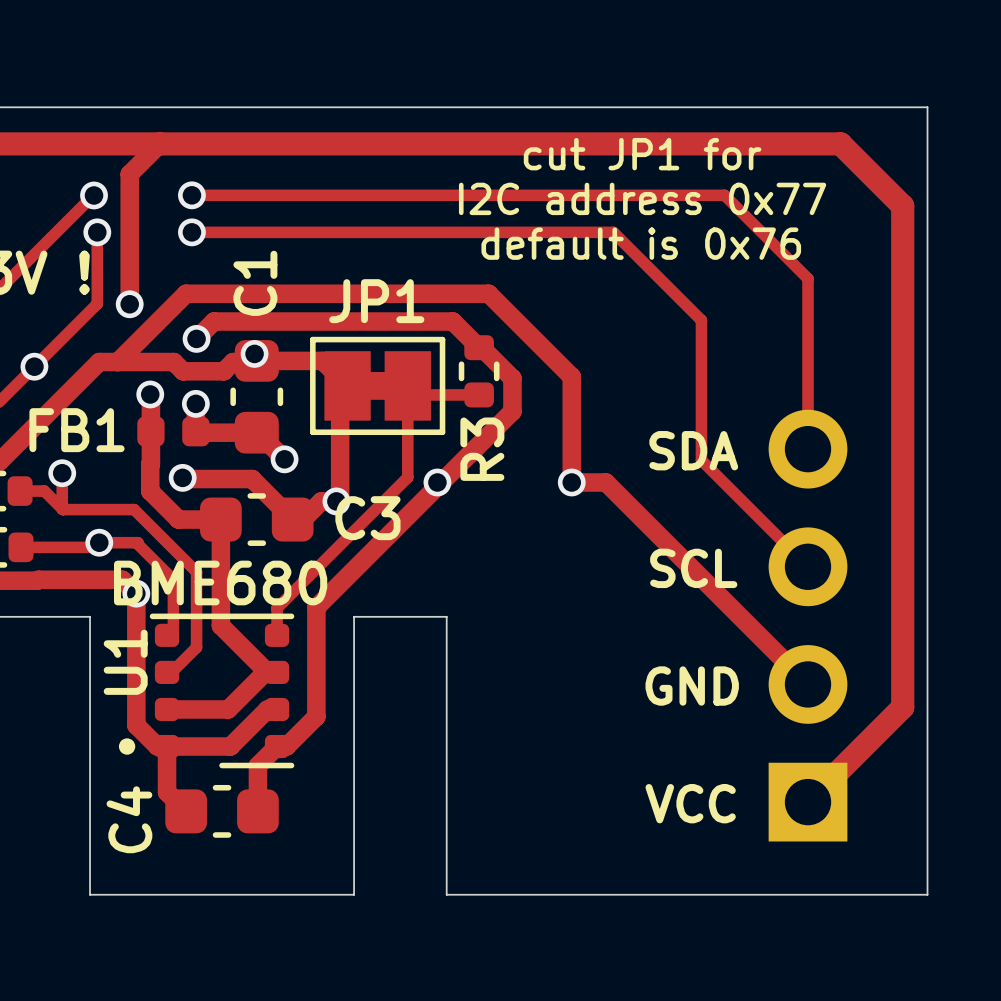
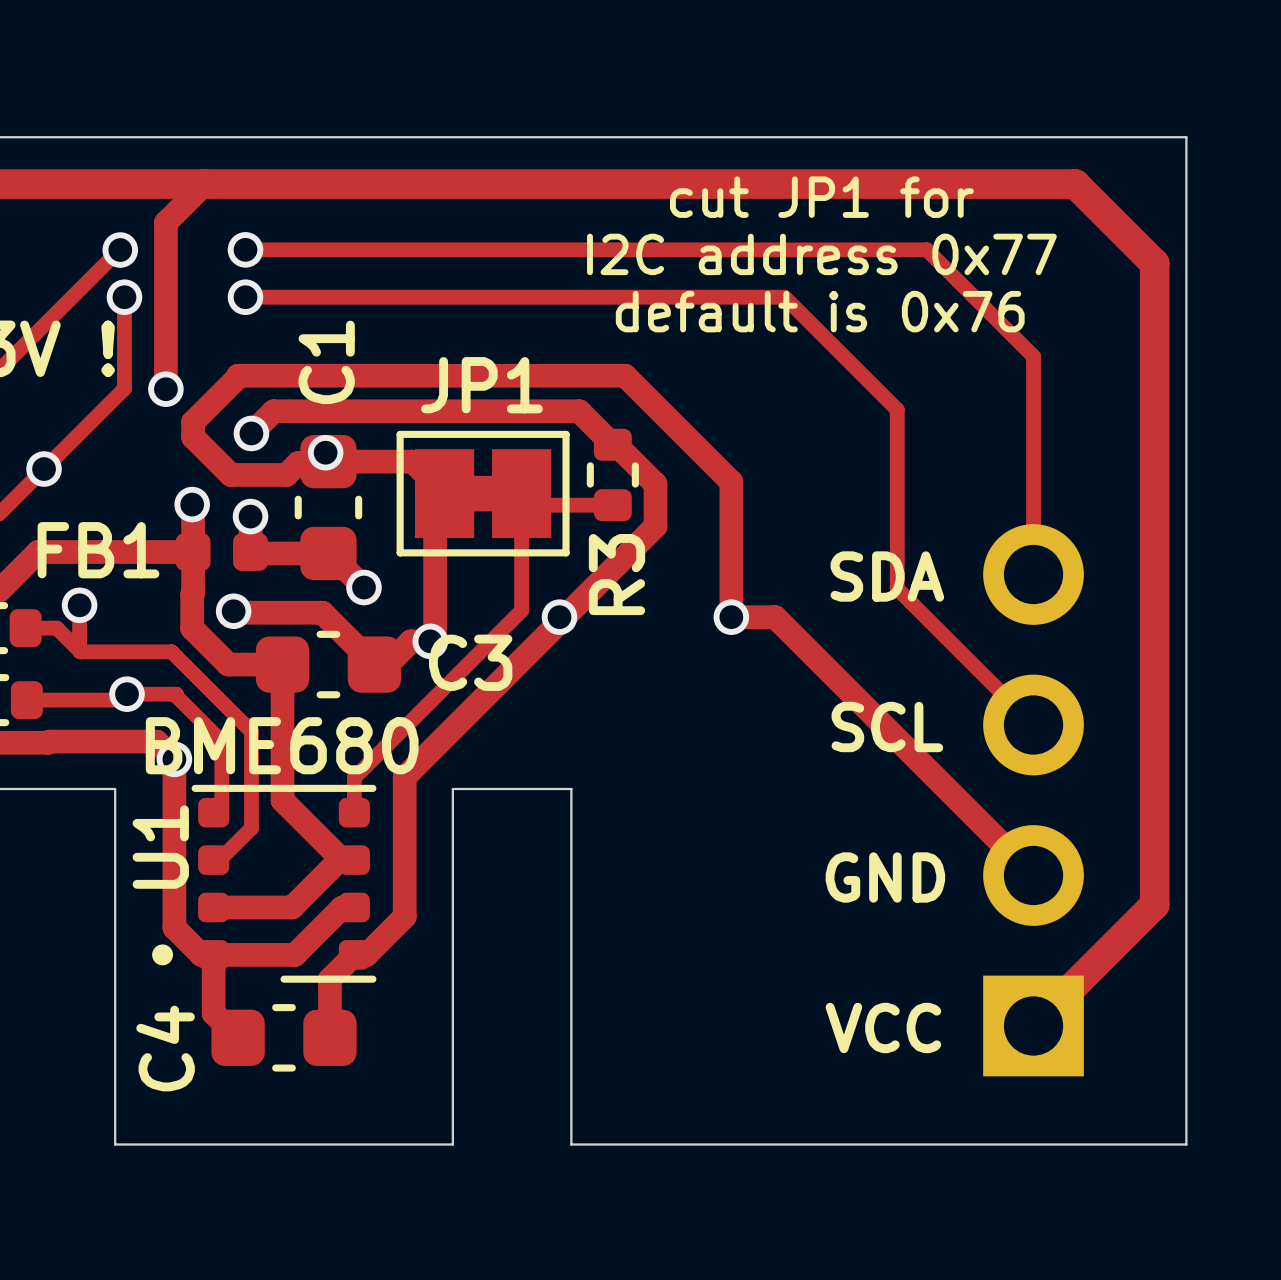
track: (186, 293) (117, 362) -> (237, 375) (193, 422) (193, 437) (230, 474) (234, 474)
track: (183, 371) (173, 362) (99, 362) (29, 431) -> (193, 551) (38, 551)

